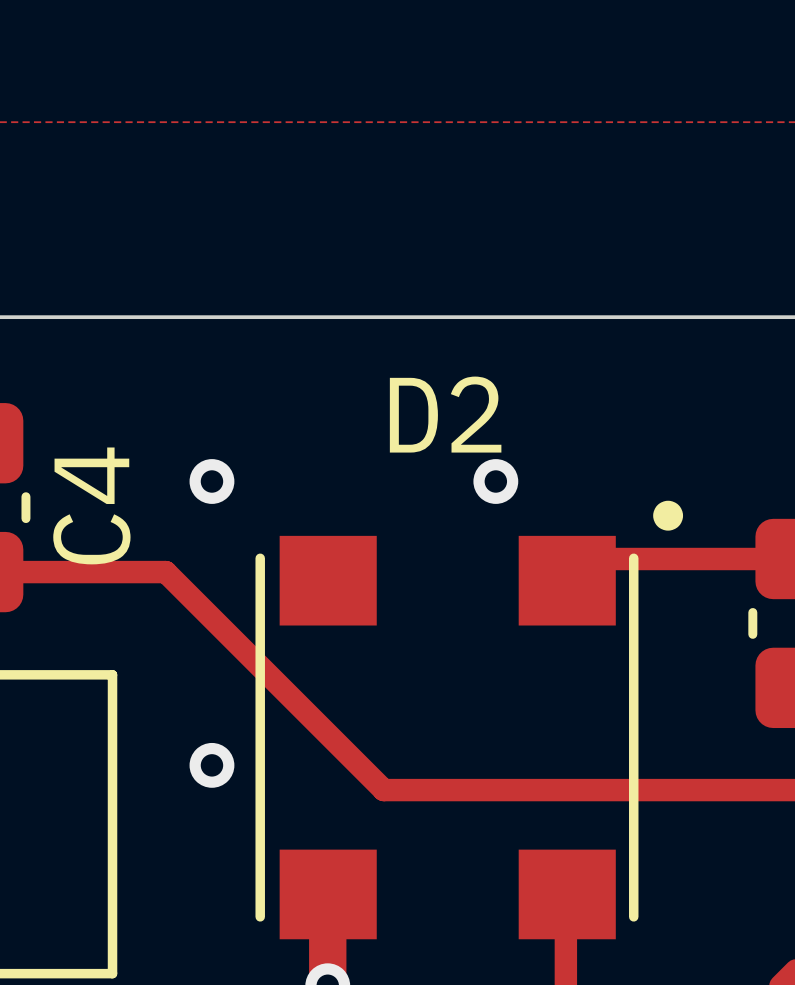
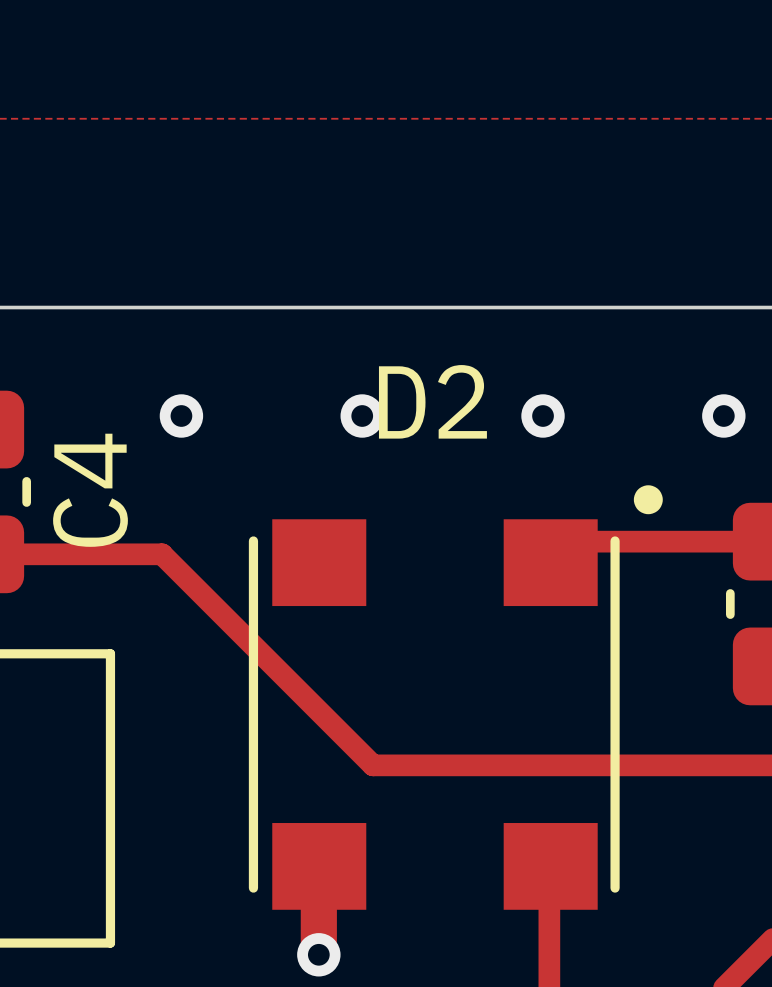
via: none -> (362, 416)
via: none -> (543, 416)
via: none -> (723, 416)
via position: (211, 481) -> (181, 416)
via: (495, 481) -> none
via: (211, 765) -> none

